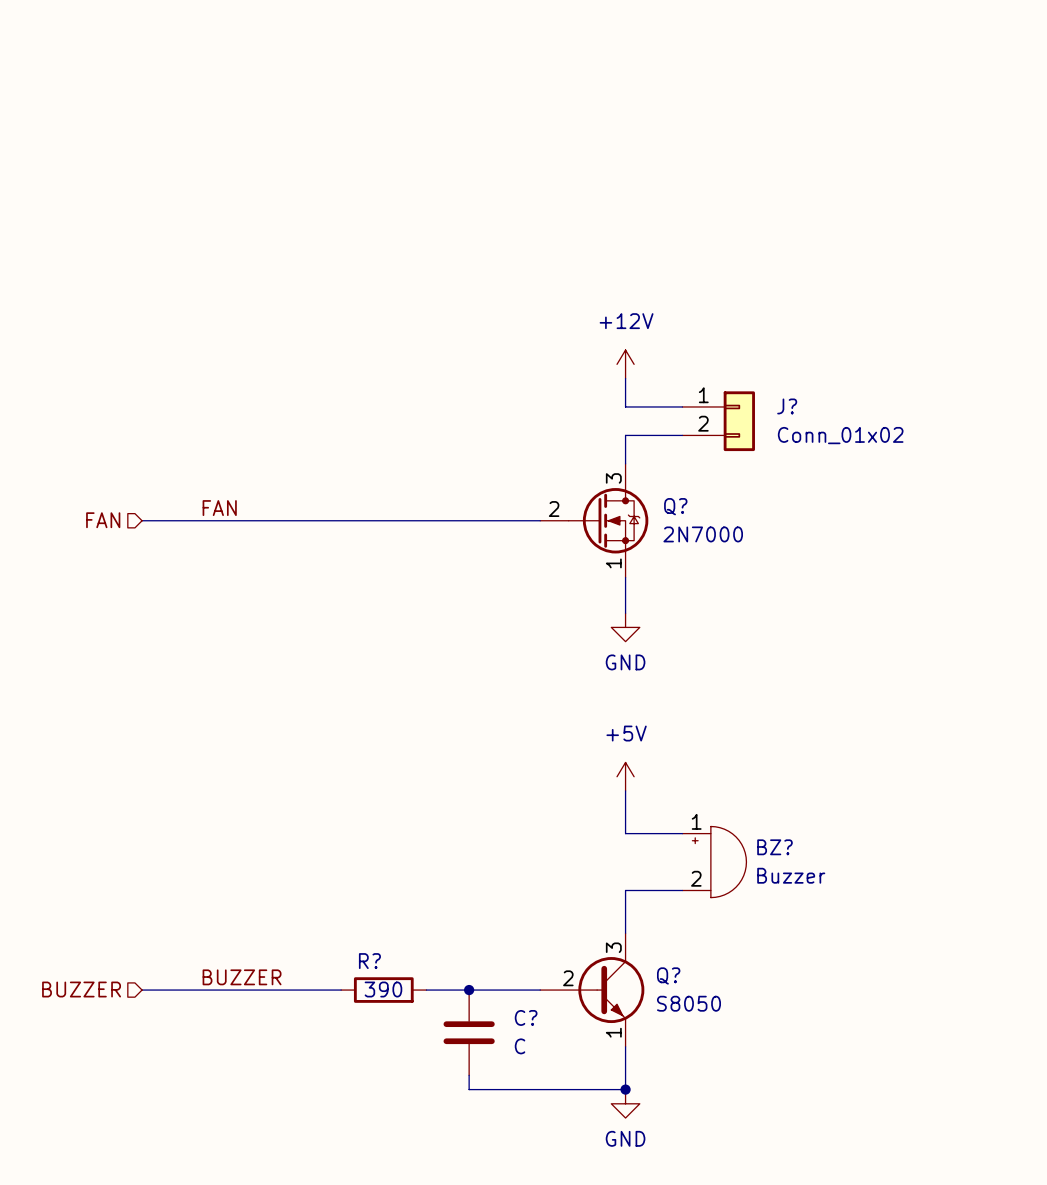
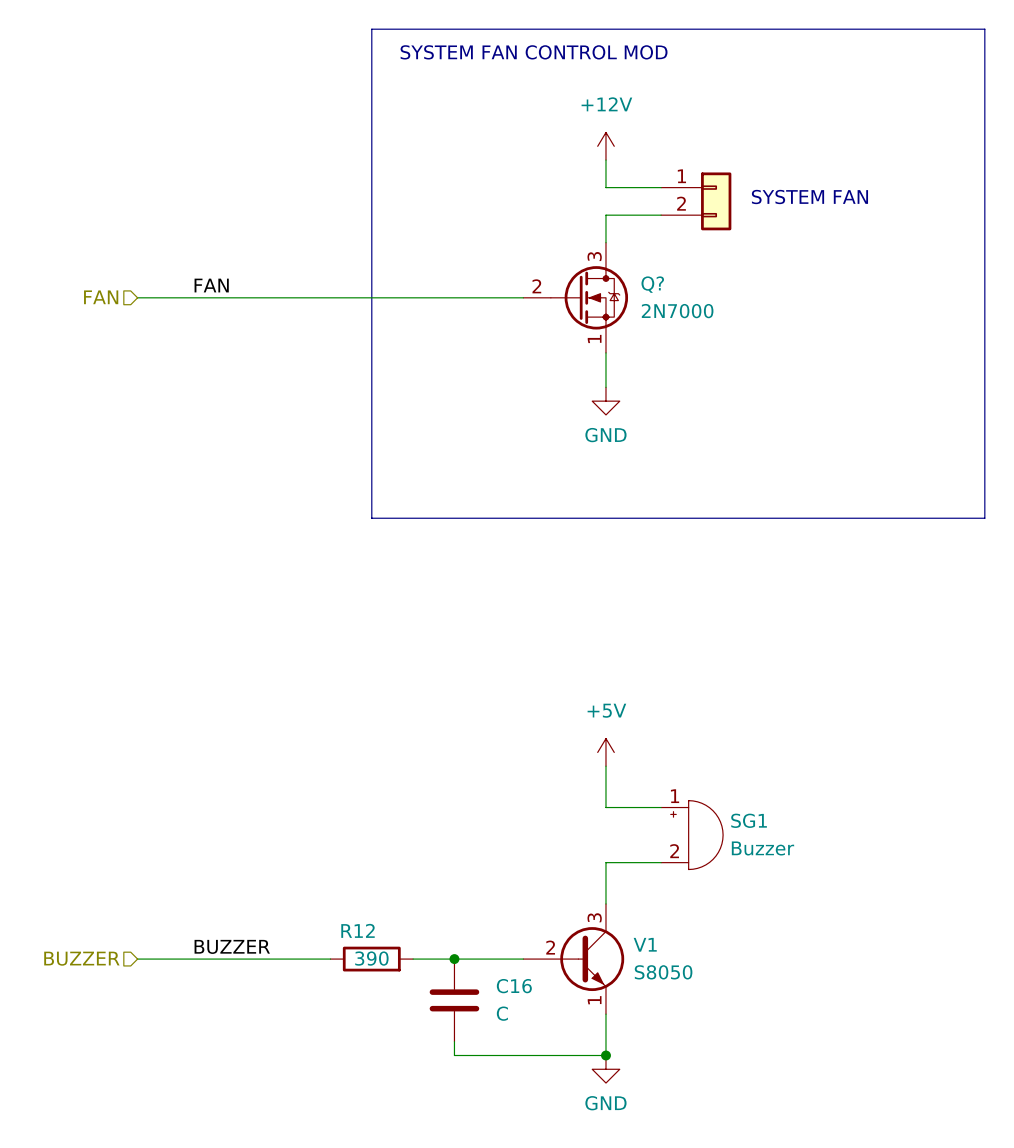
line: none -> (371, 29) (984, 29) (984, 518) (371, 518) (371, 29)
text: none -> SYSTEM FAN CONTROL MOD (534, 52)
wire: none -> (605, 160) (605, 187) (661, 187)
text: none -> SYSTEM FAN (809, 197)
part: none -> (696, 201)
power symbol position: +12V (625, 364) -> +12V (605, 146)
wire: (625, 399) (625, 406) (682, 406) -> none
J?: Conn_01x02 (718, 421) -> none
wire: (682, 435) (625, 435) (625, 463) -> (661, 215) (605, 215) (605, 242)
label position: FAN (219, 508) -> FAN (211, 285)
hierarchical label position: FAN (103, 520) -> FAN (101, 297)
wire: (142, 520) (540, 520) -> (137, 297) (523, 297)
Q? position: (594, 520) -> (575, 297)
wire: (625, 577) (625, 613) -> none
power symbol position: GND (625, 627) -> GND (605, 401)
BZ? name: BZ? (774, 847) -> SG1 (749, 820)
R? name: R? (369, 961) -> R12 (358, 930)
Q? name: Q? (668, 975) -> V1 (645, 944)
C? name: C? (526, 1017) -> C16 (514, 986)

